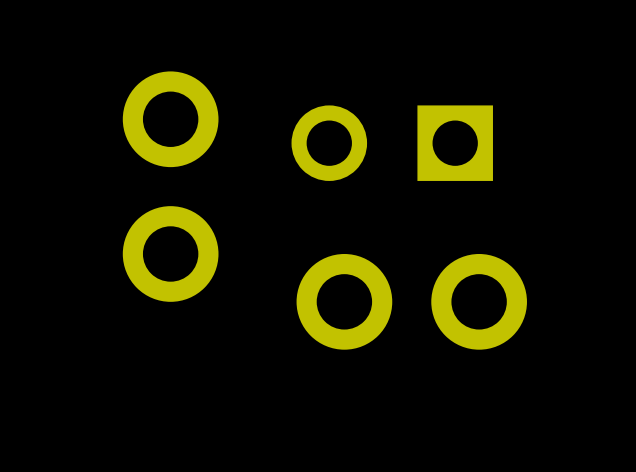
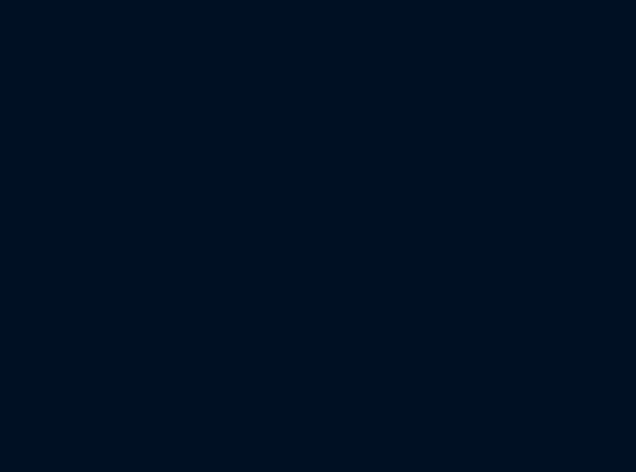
part: (170, 119) -> none
part: (392, 143) -> none
part: (170, 253) -> none
part: (344, 301) -> none
part: (479, 301) -> none

